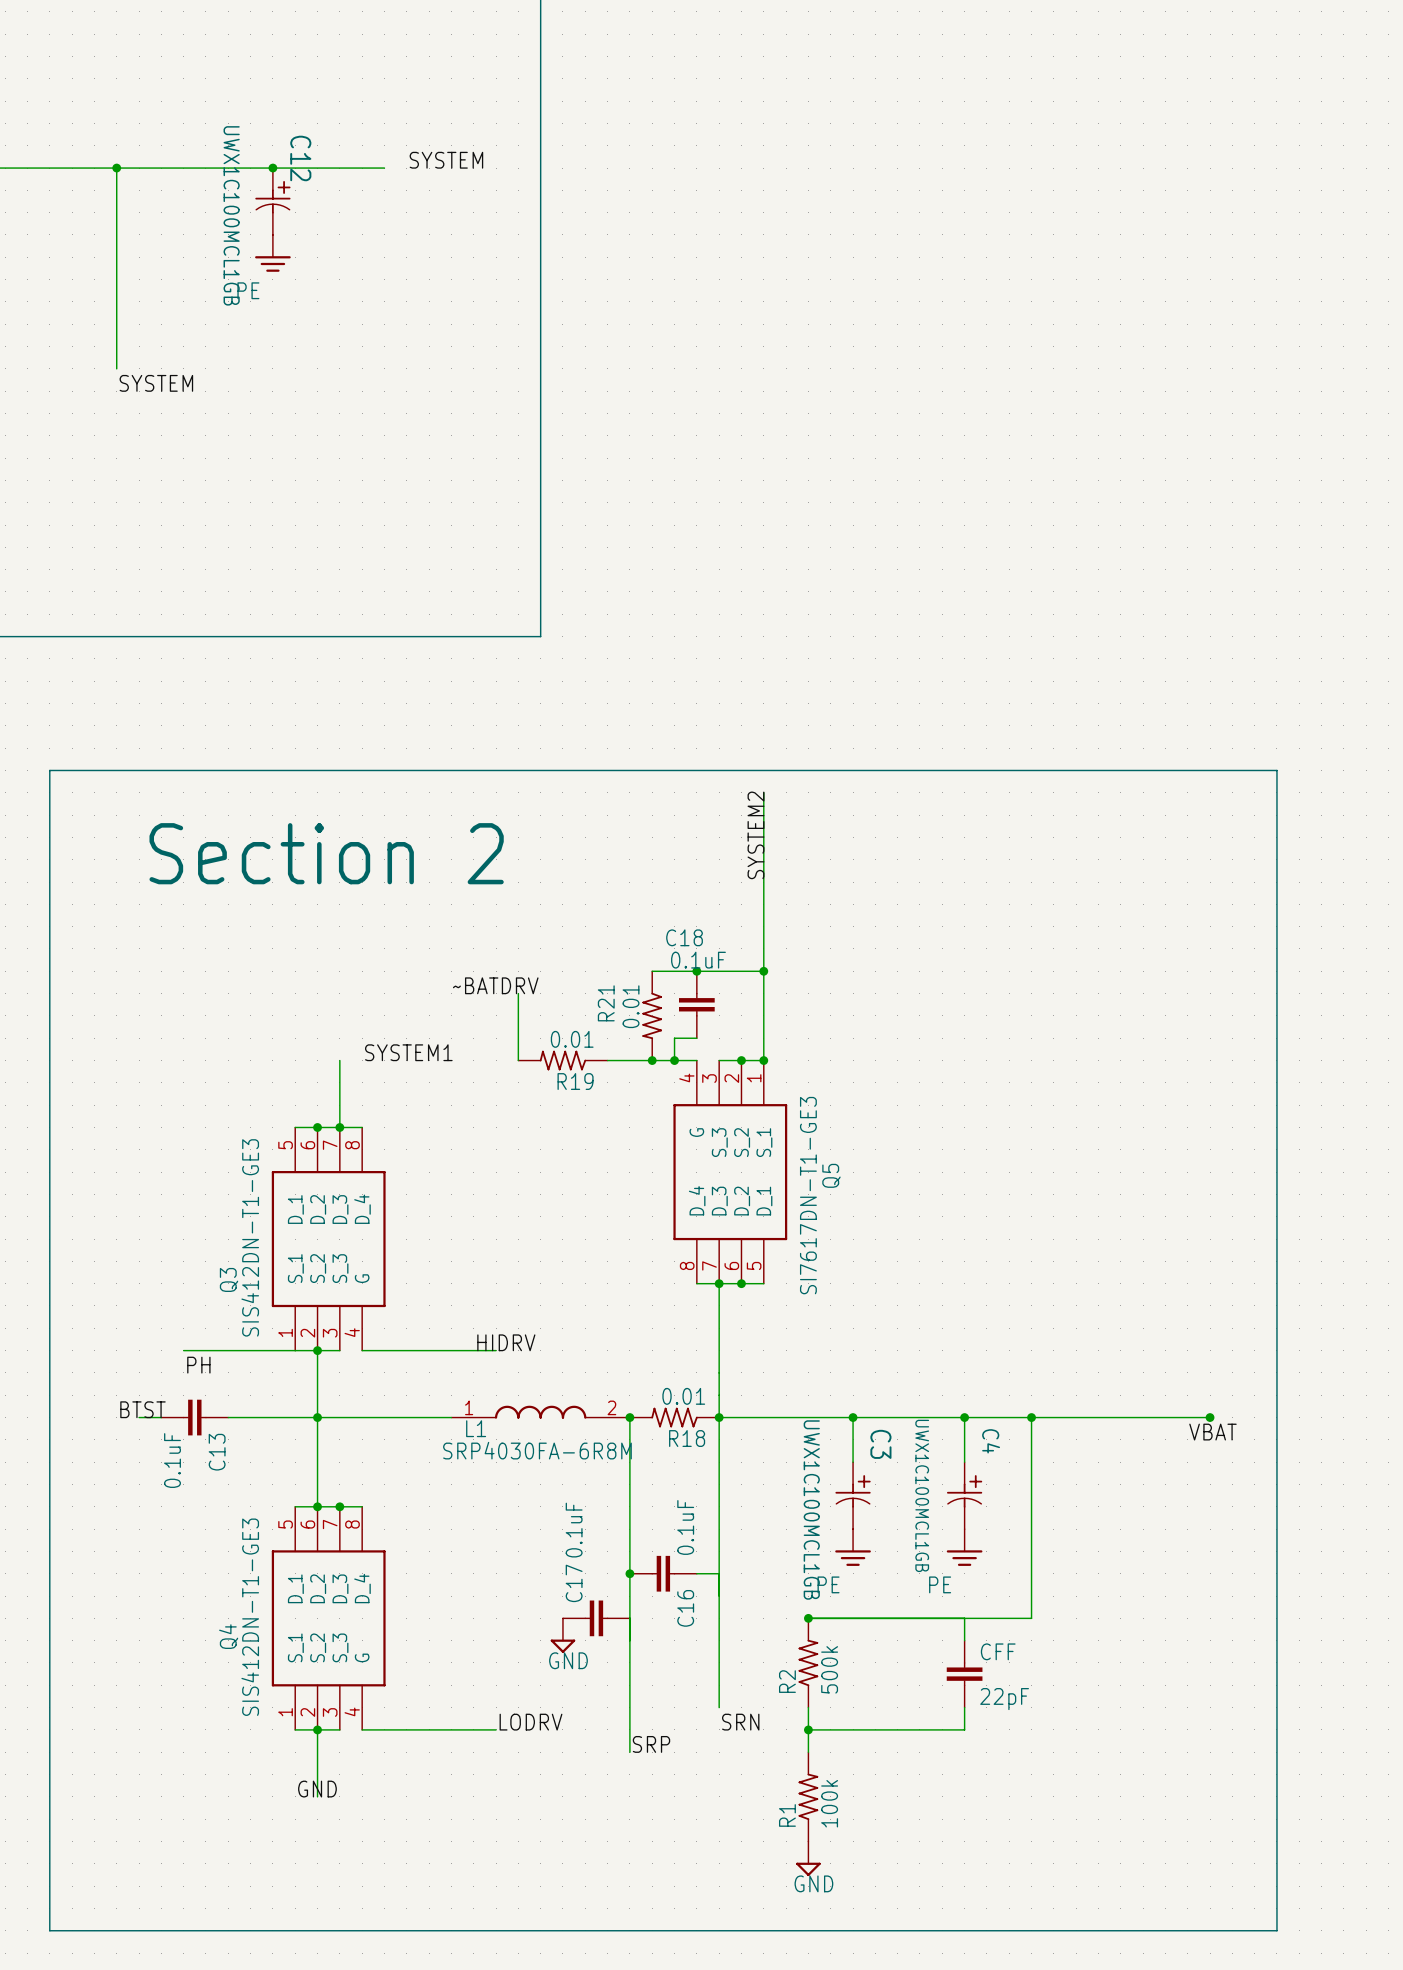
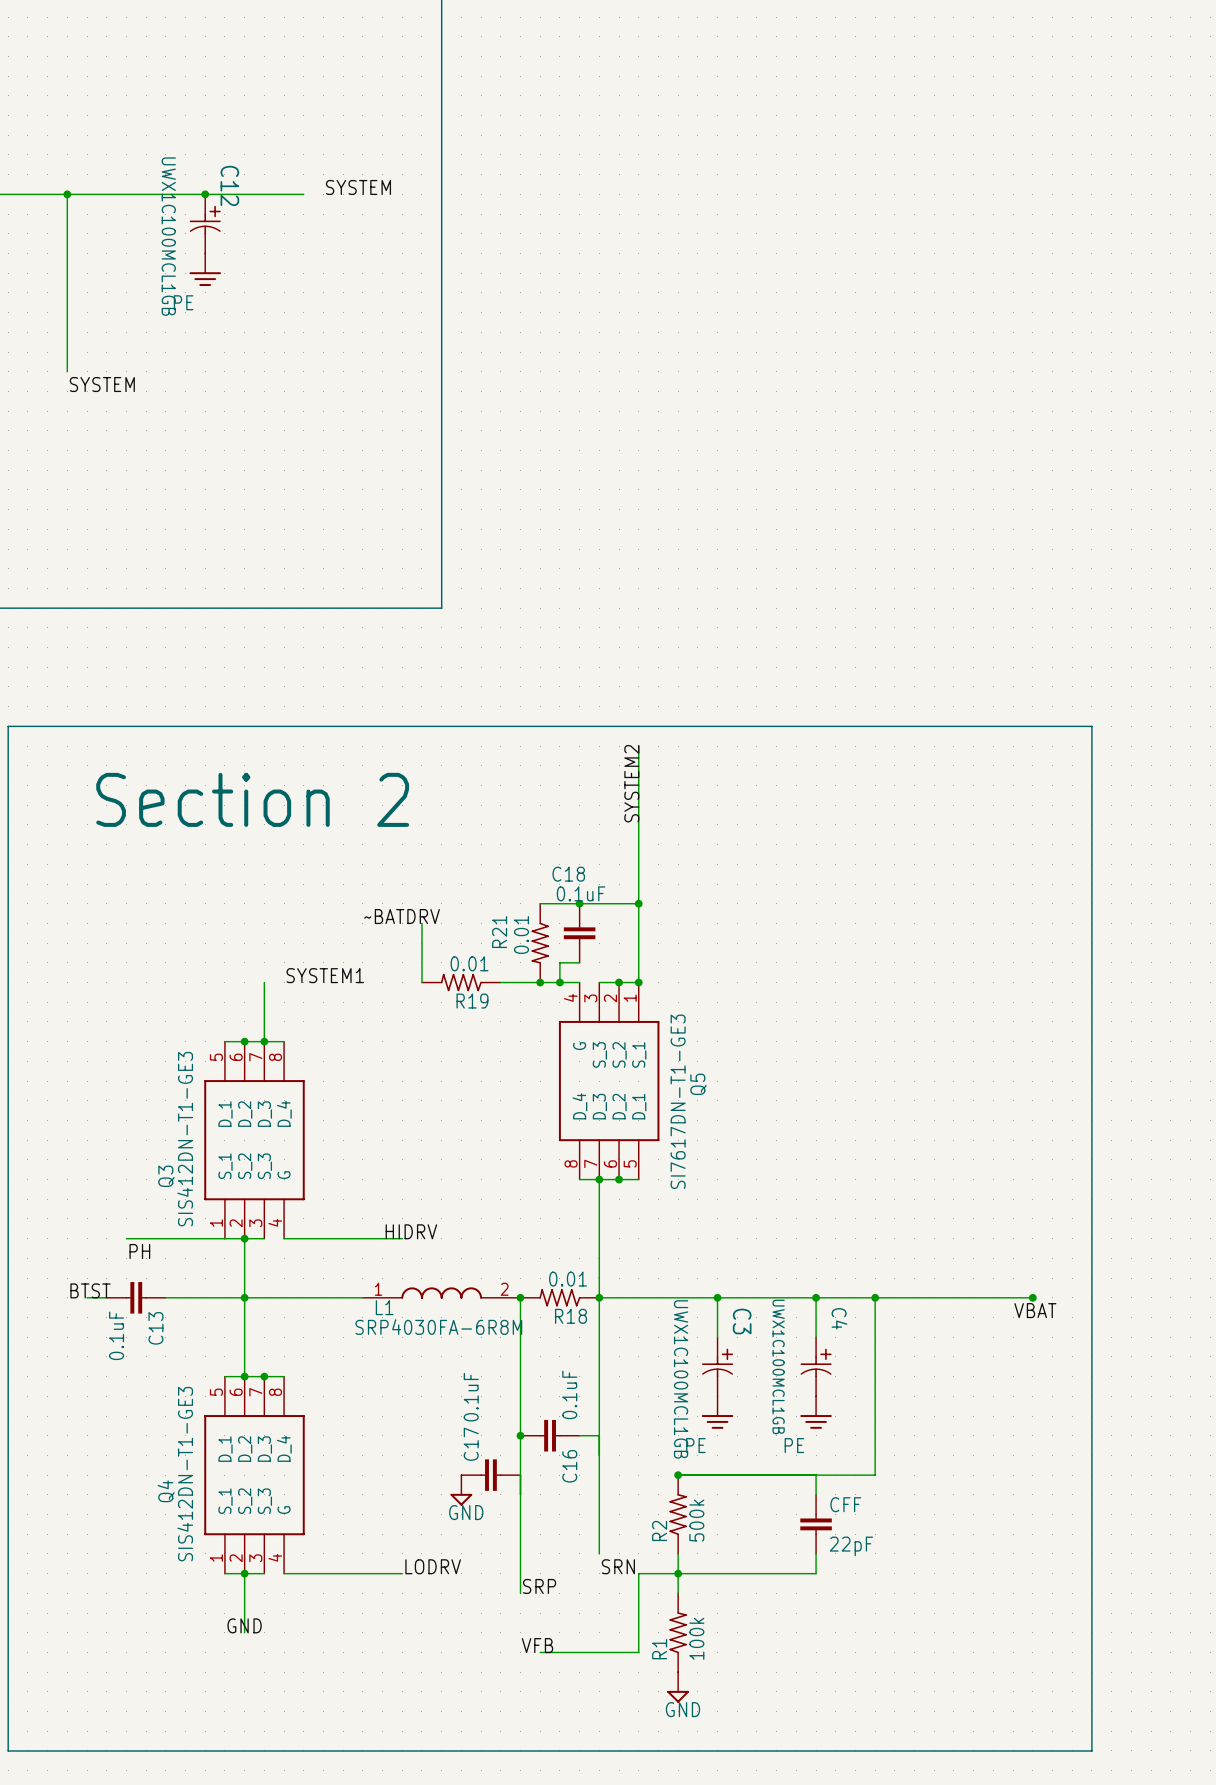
wire: none -> (678, 1573) (638, 1573) (638, 1652) (540, 1652)
label: none -> VFB (537, 1645)

